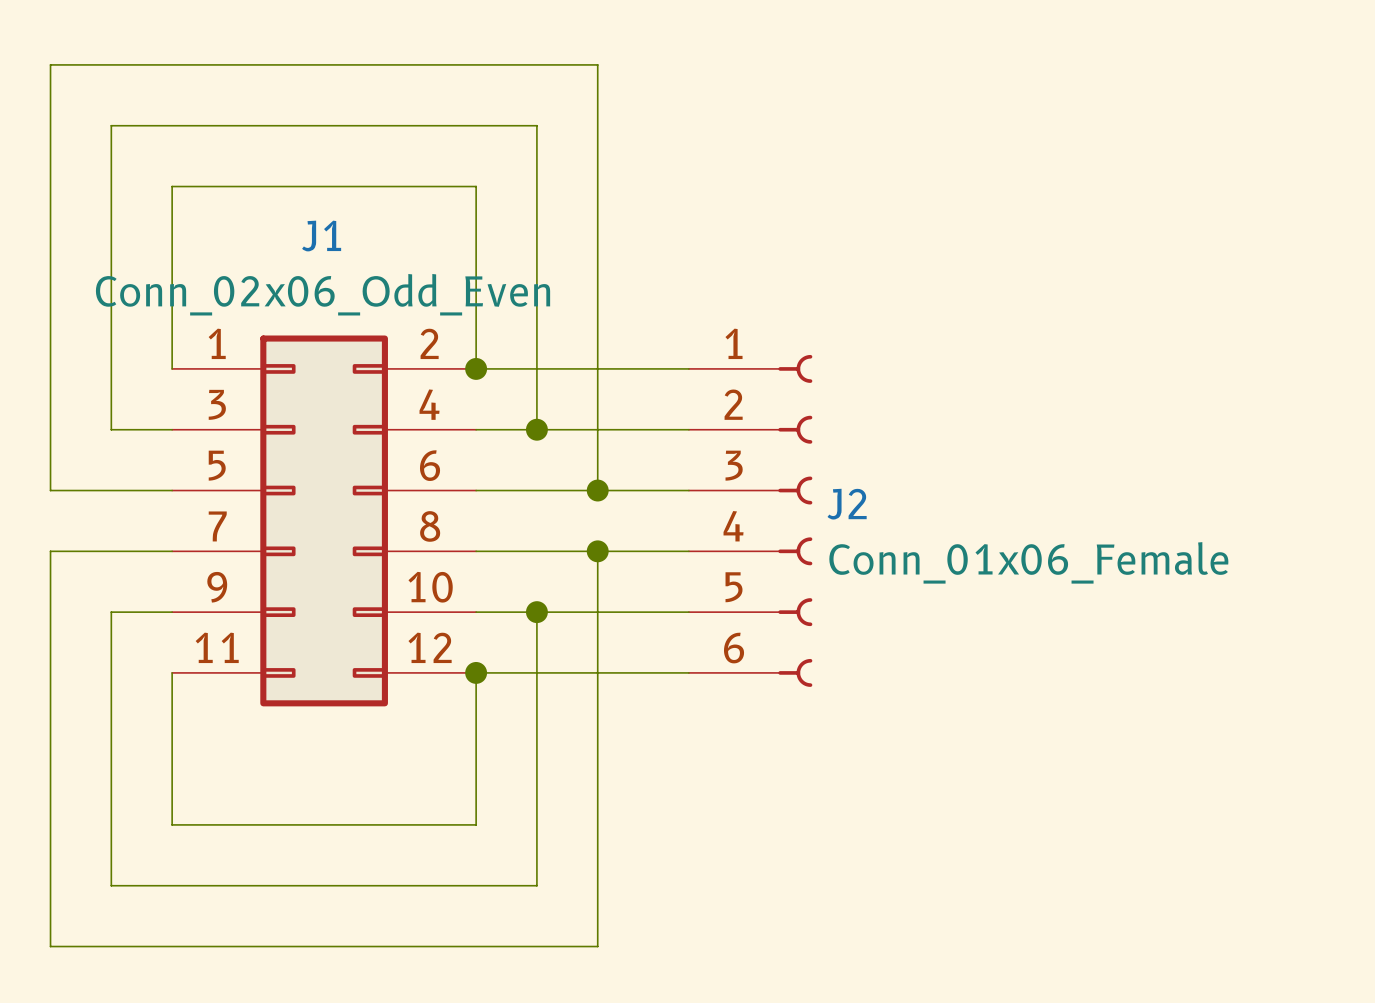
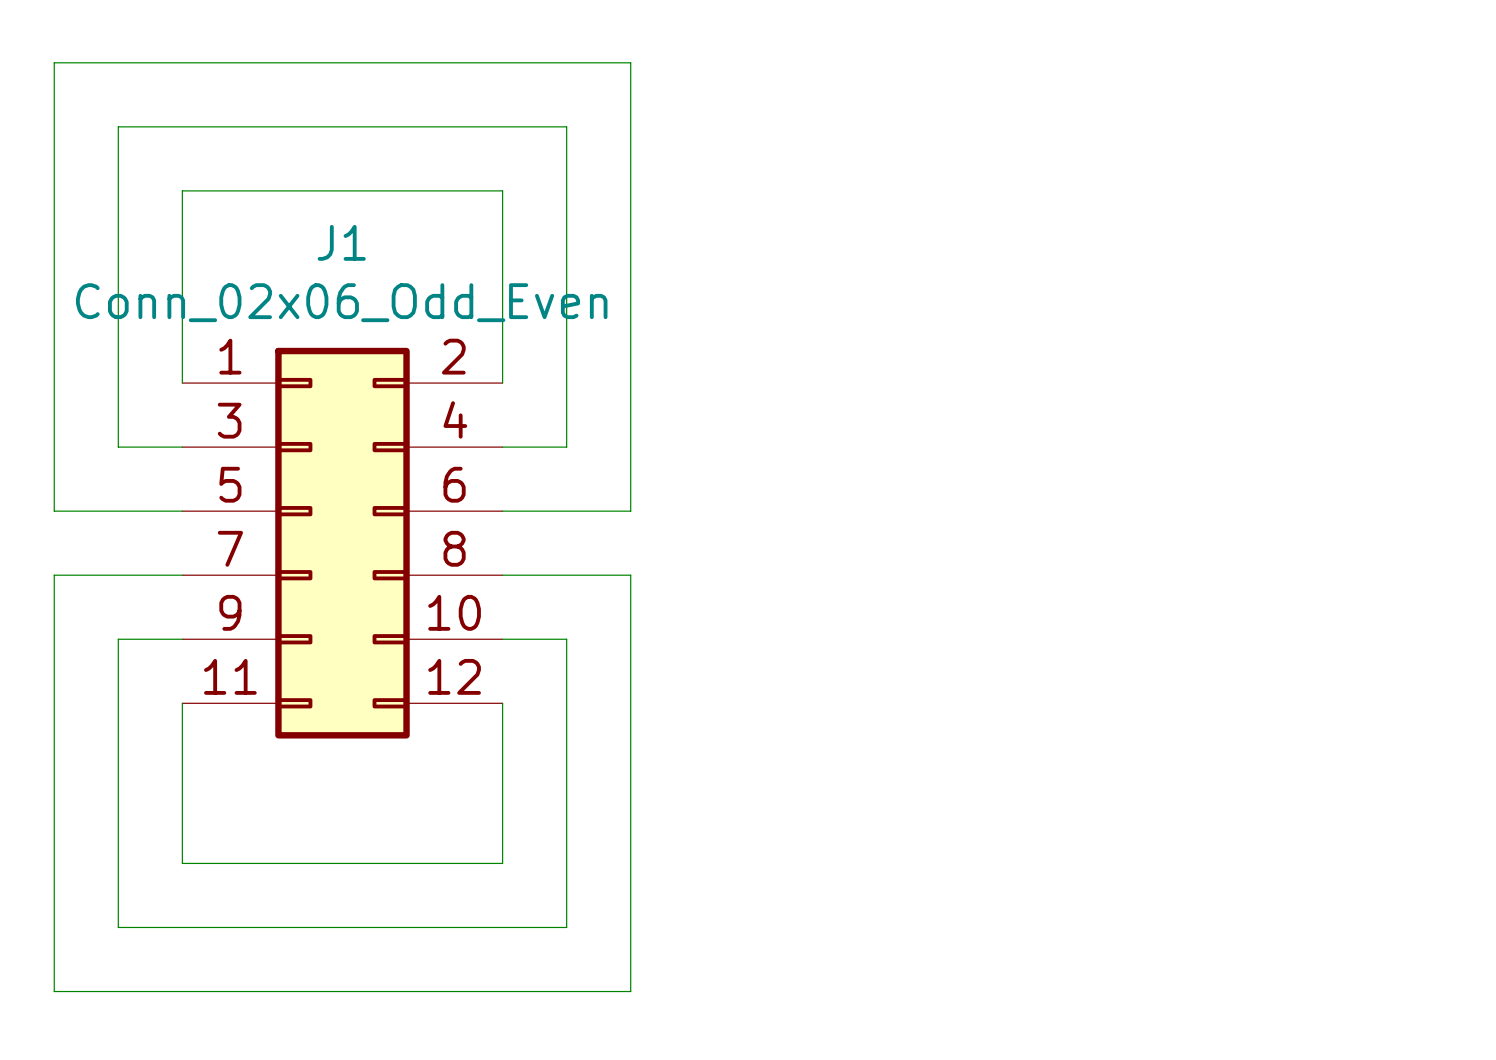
wire: (476, 368) (688, 368) -> none
junction: (476, 368) -> none
wire: (536, 429) (688, 429) -> none
junction: (536, 429) -> none
wire: (597, 490) (688, 490) -> none
junction: (597, 490) -> none
J2: Conn_01x06_Female (750, 520) -> none
wire: (597, 551) (688, 551) -> none
junction: (597, 551) -> none
wire: (536, 612) (688, 612) -> none
junction: (536, 612) -> none
wire: (476, 672) (688, 672) -> none
junction: (476, 672) -> none

